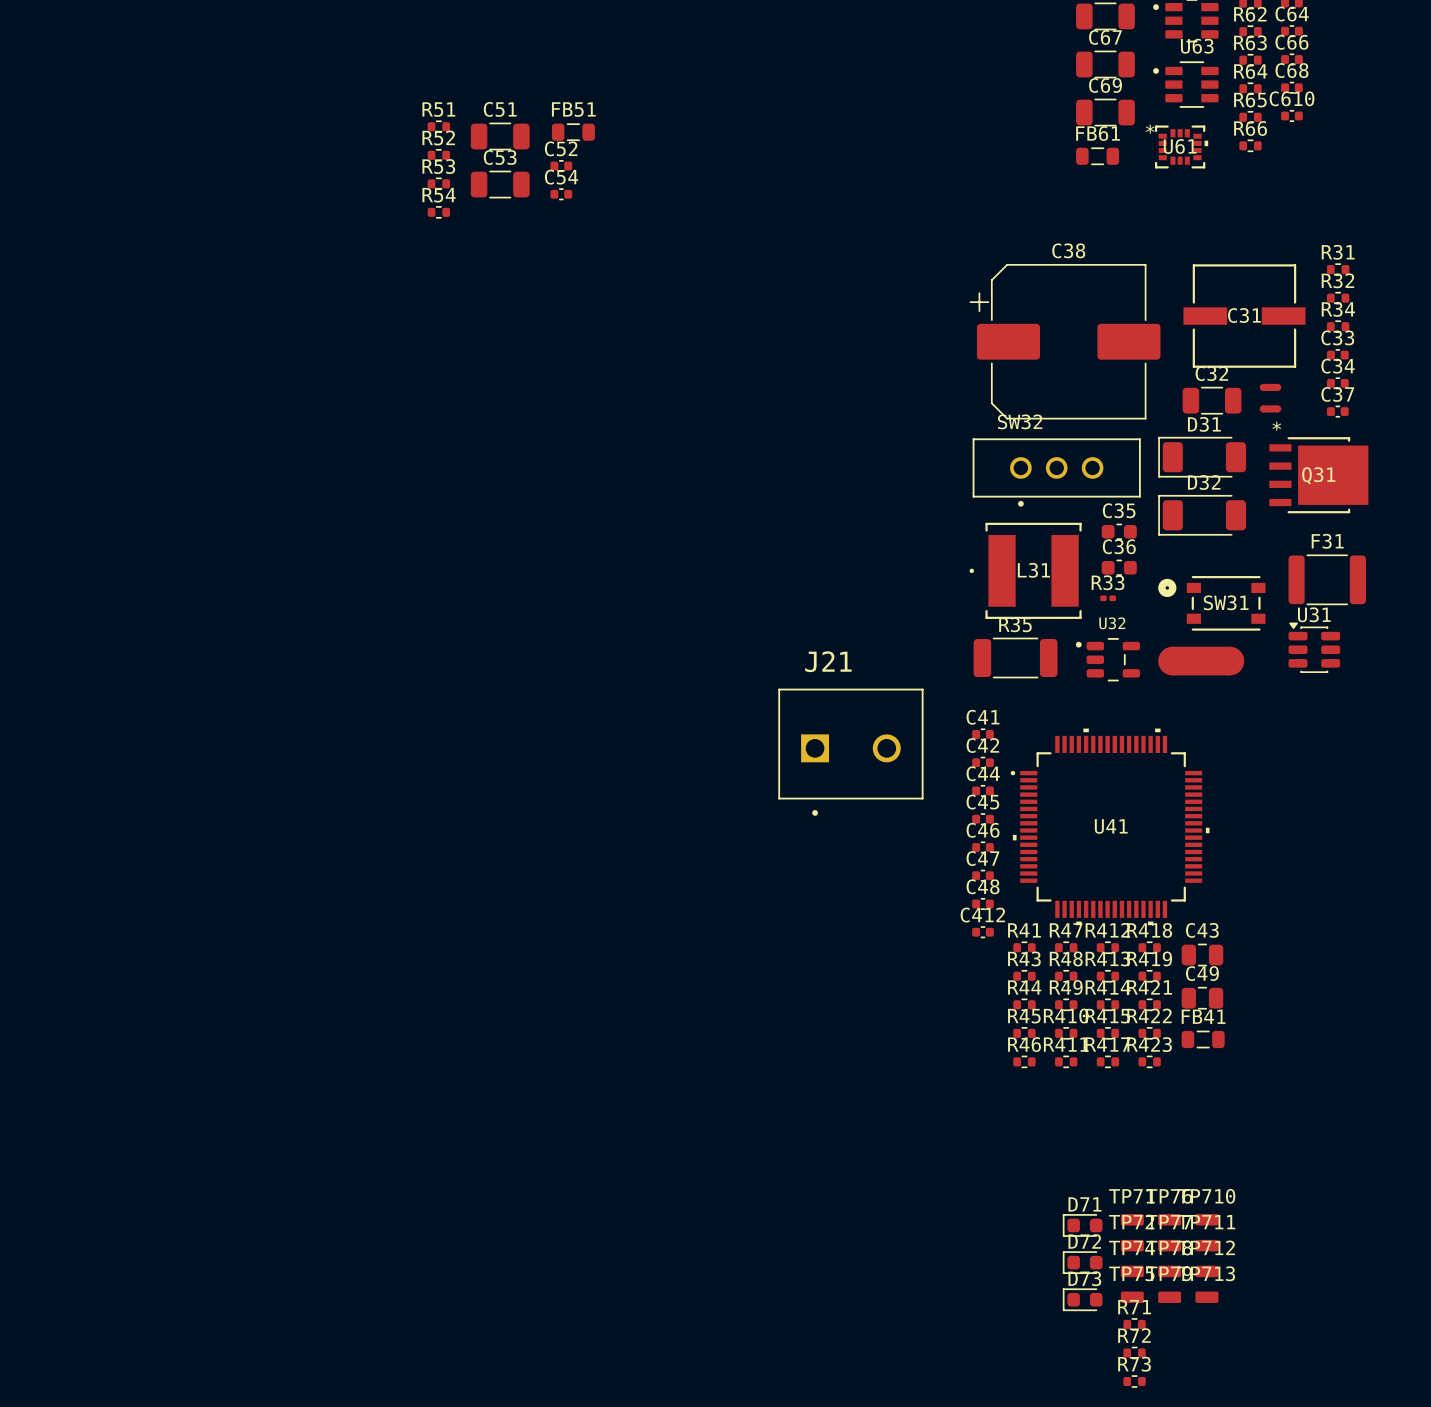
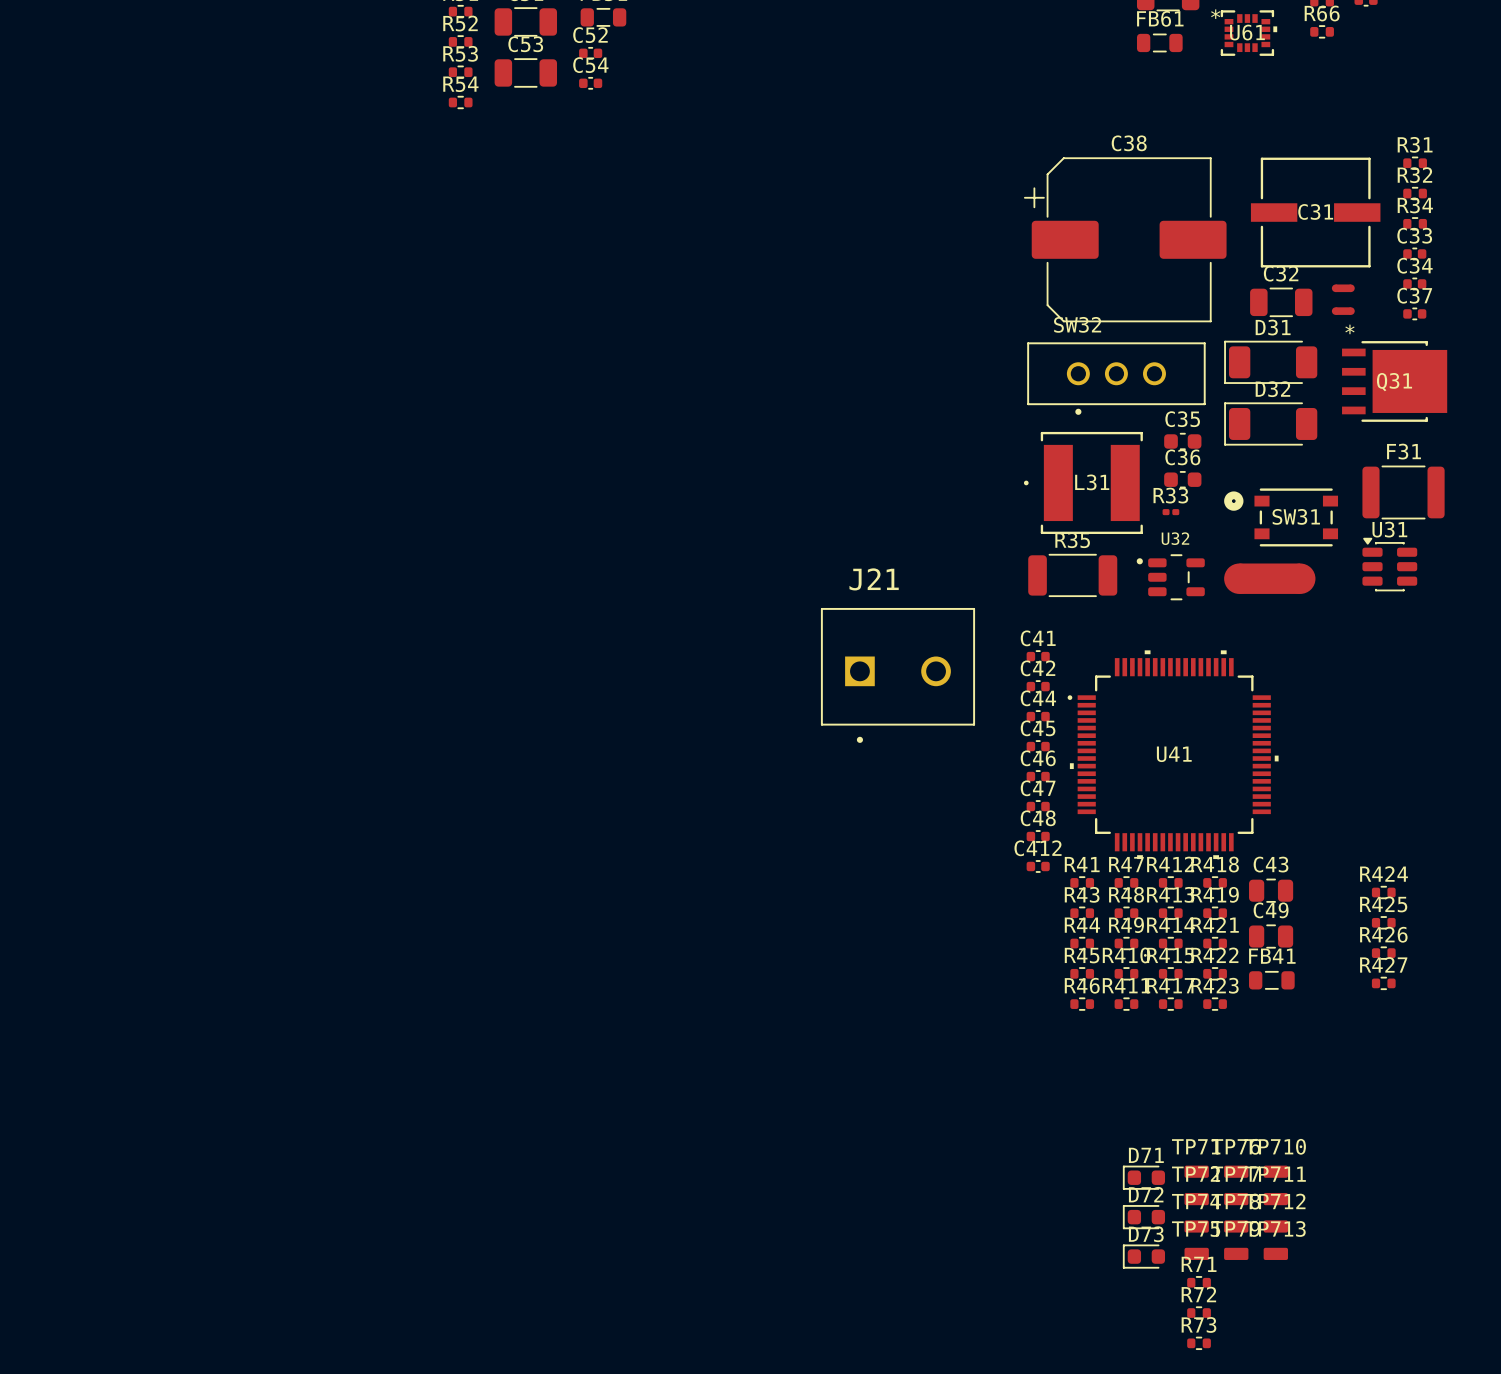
R424: none -> (1383, 892)
R425: none -> (1383, 922)
R426: none -> (1383, 953)
R427: none -> (1383, 983)

